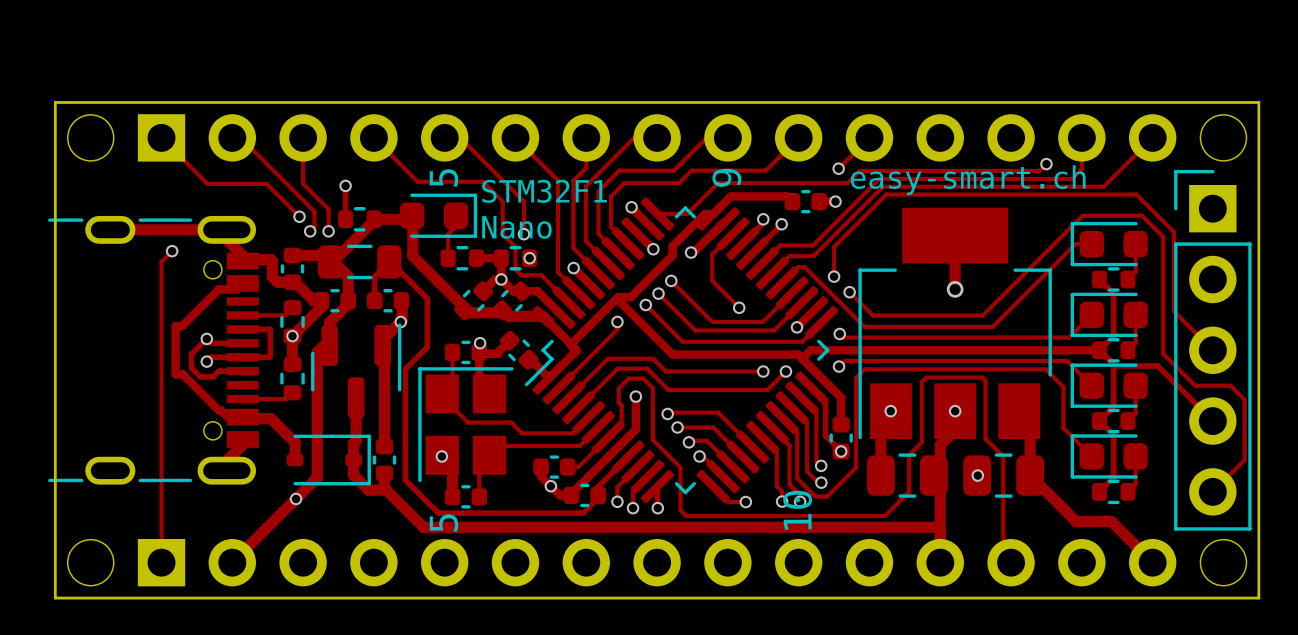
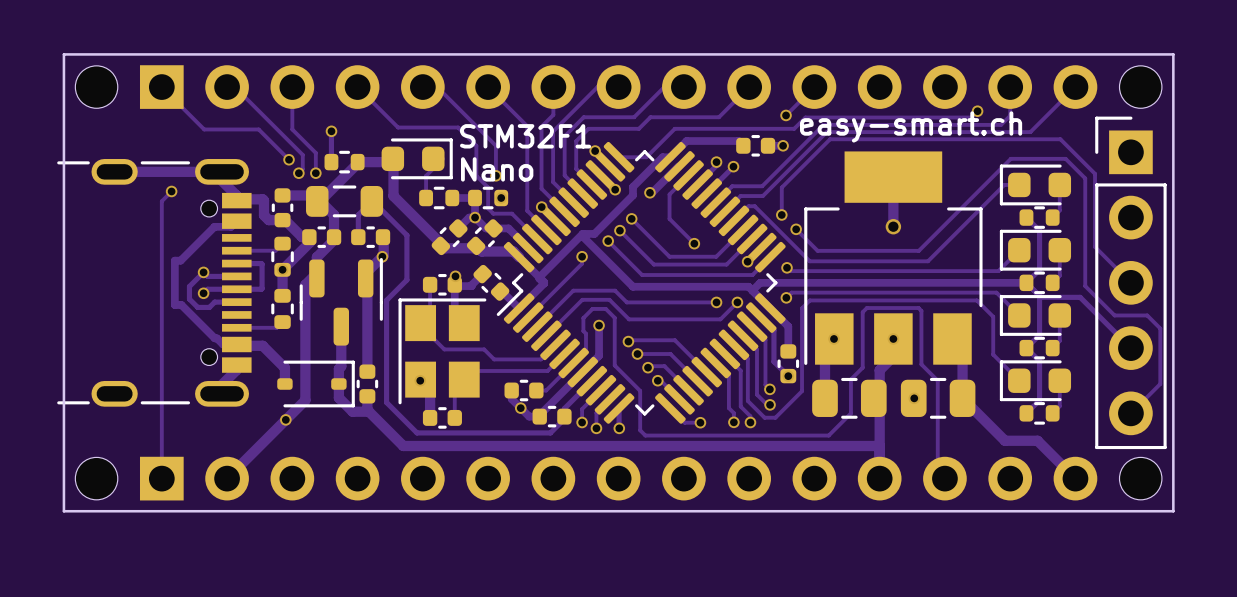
text: 5 (443, 177) -> none
text: 9 (726, 177) -> none
text: 10 (797, 510) -> none
text: 5 (443, 523) -> none

